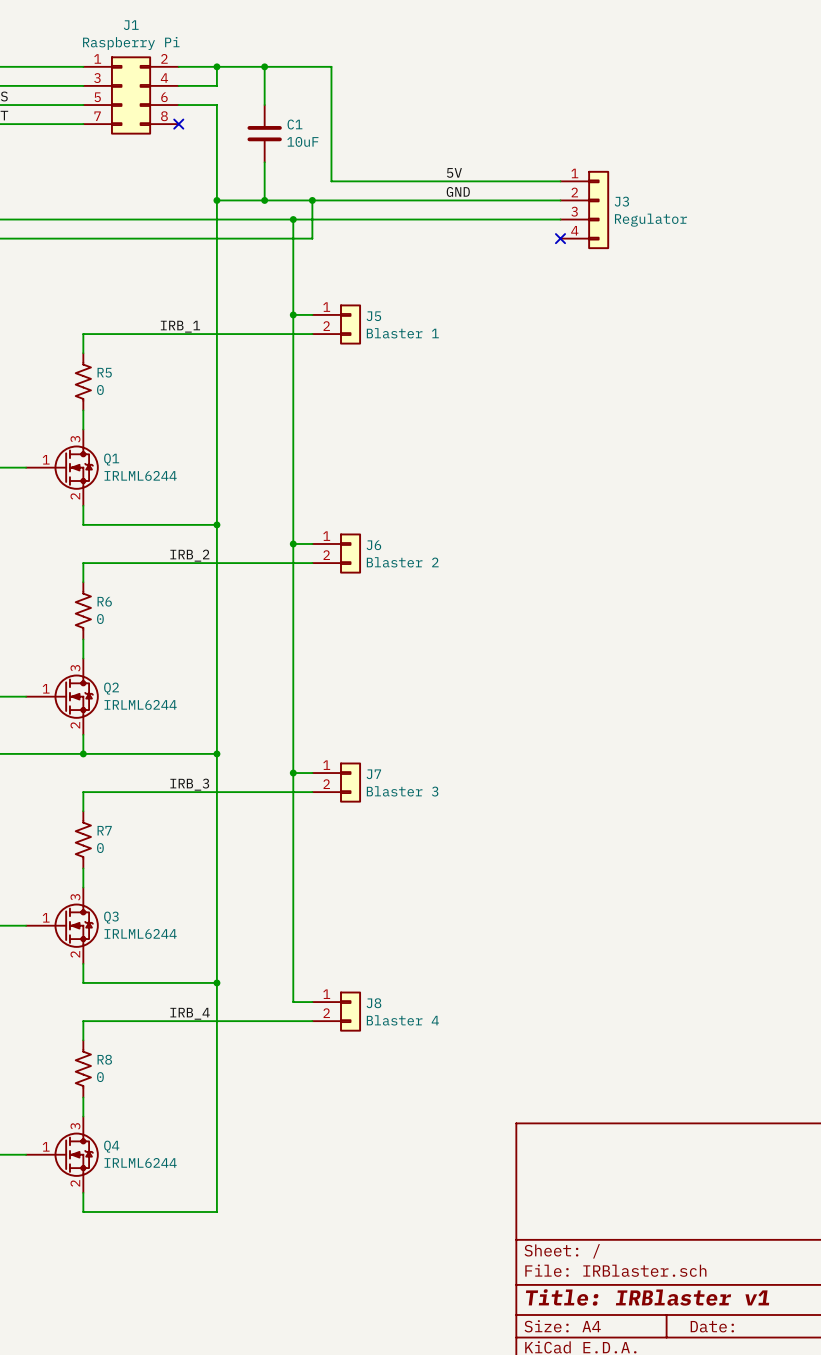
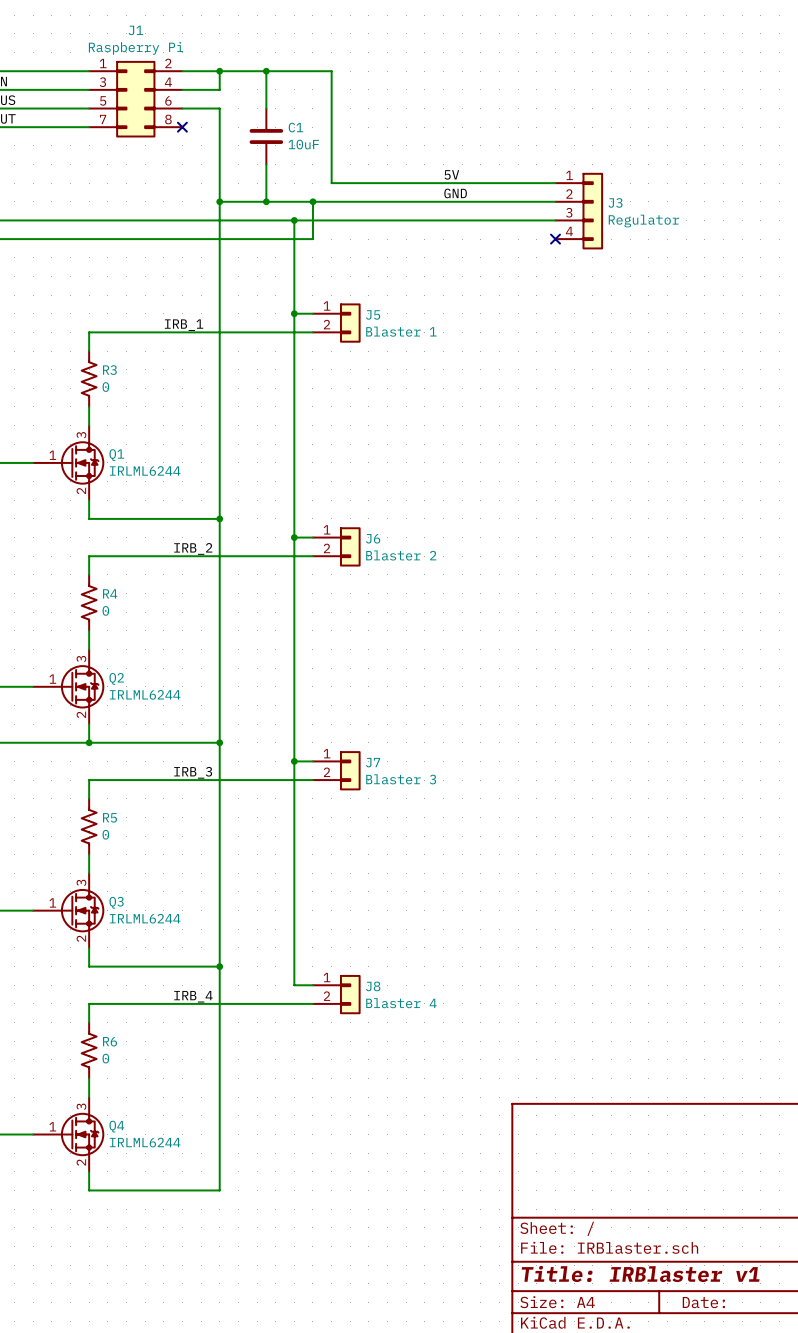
R5 name: R5 (104, 372) -> R3 (109, 370)
R6 name: R6 (104, 601) -> R4 (110, 593)
R7 name: R7 (104, 830) -> R5 (110, 817)
R8 name: R8 (104, 1059) -> R6 (110, 1041)

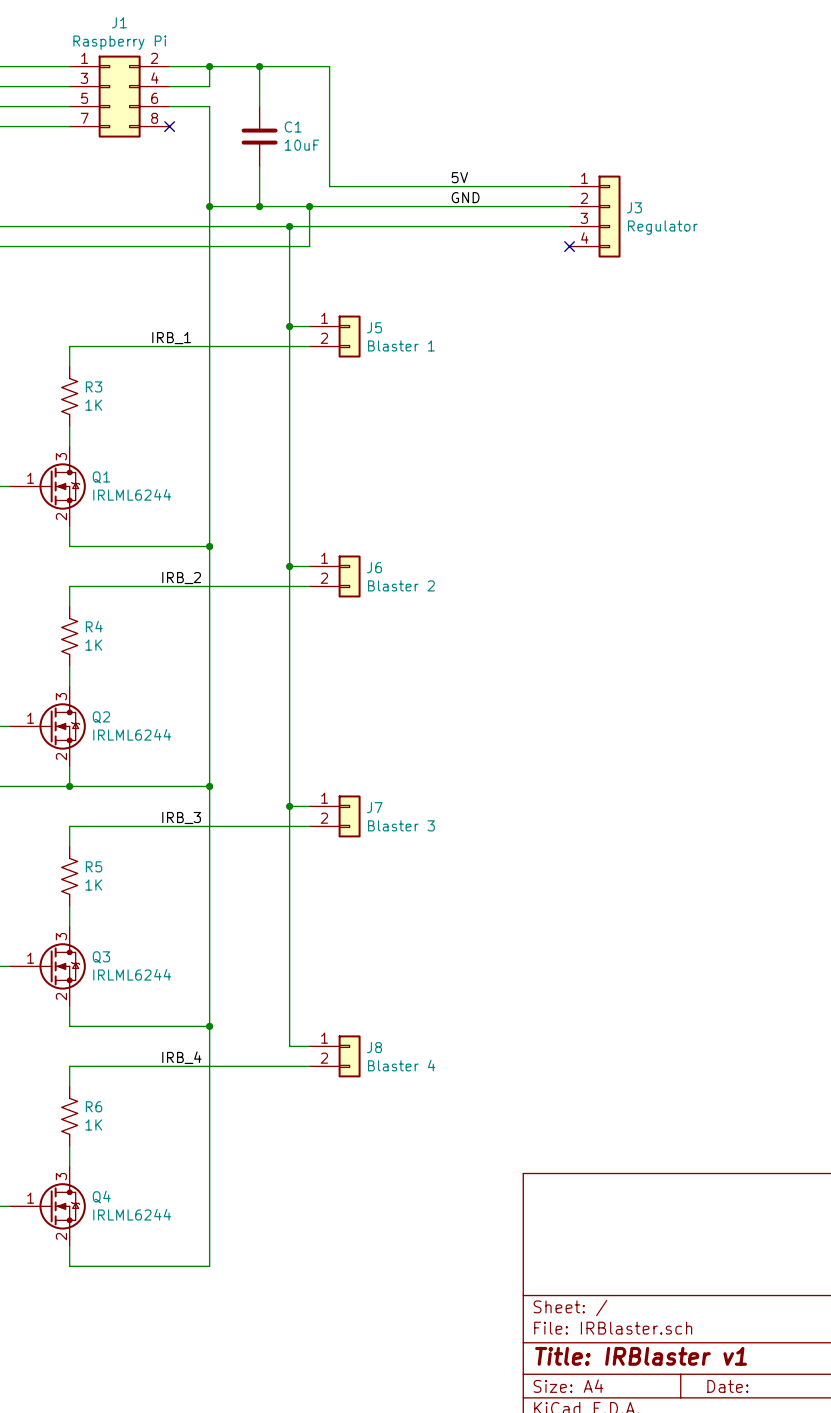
R3 value: 0 (105, 387) -> 1K (93, 405)
R4 value: 0 (105, 610) -> 1K (93, 645)
R5 value: 0 (105, 834) -> 1K (93, 885)
R6 value: 0 (105, 1058) -> 1K (93, 1125)

